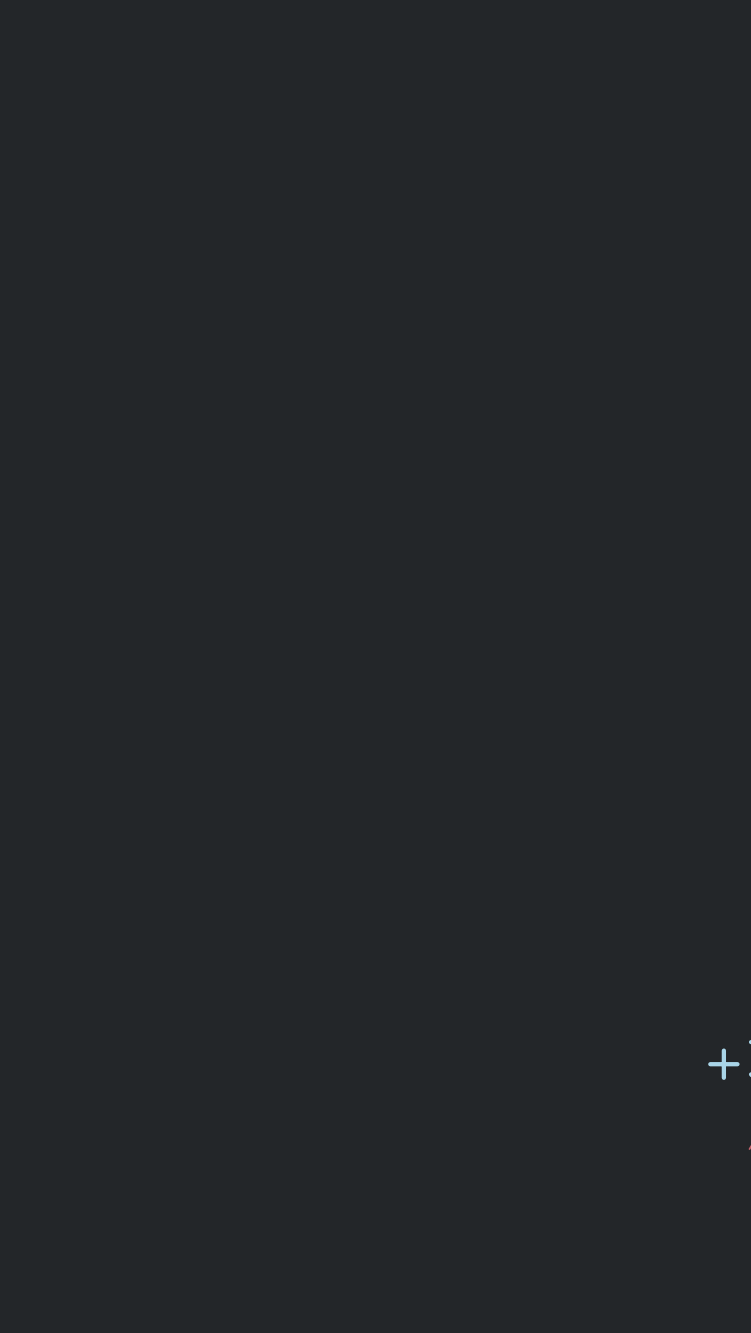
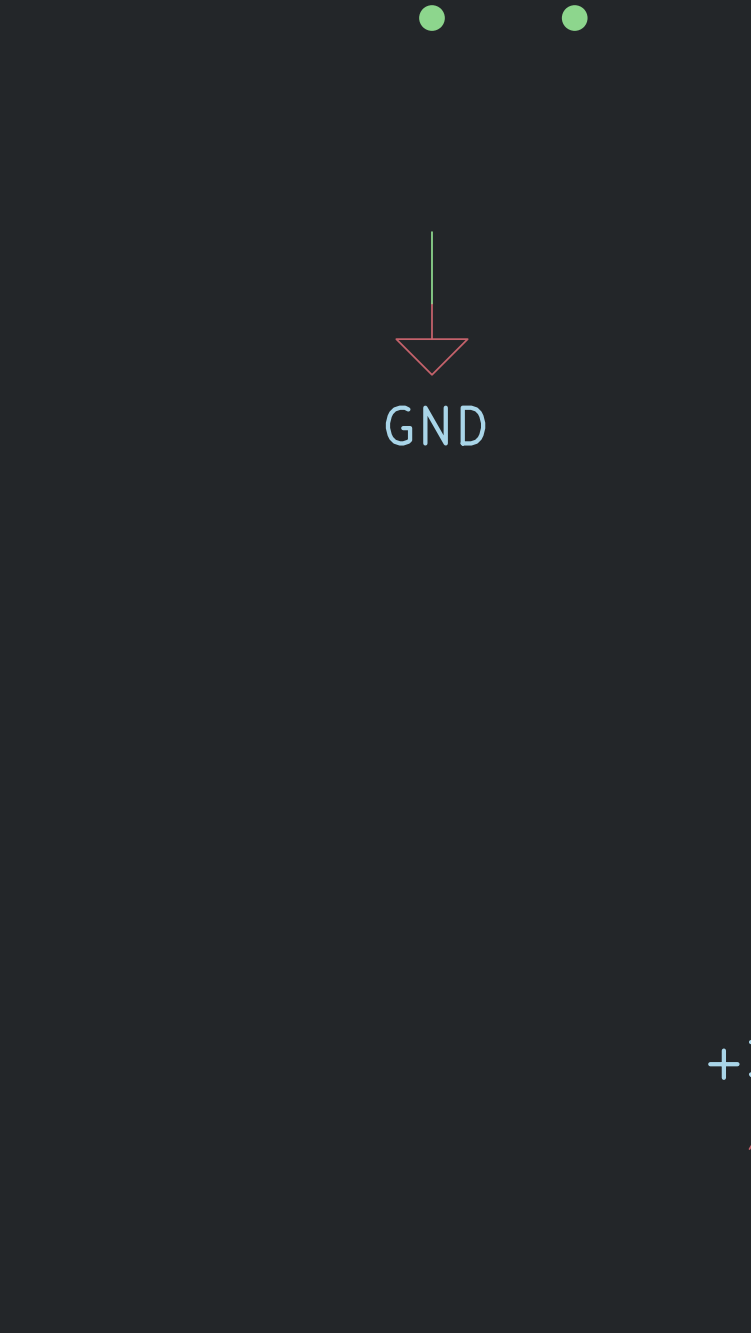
junction: none -> (431, 18)
junction: none -> (574, 18)
wire: none -> (431, 232) (431, 303)
power symbol: none -> GND (431, 339)

